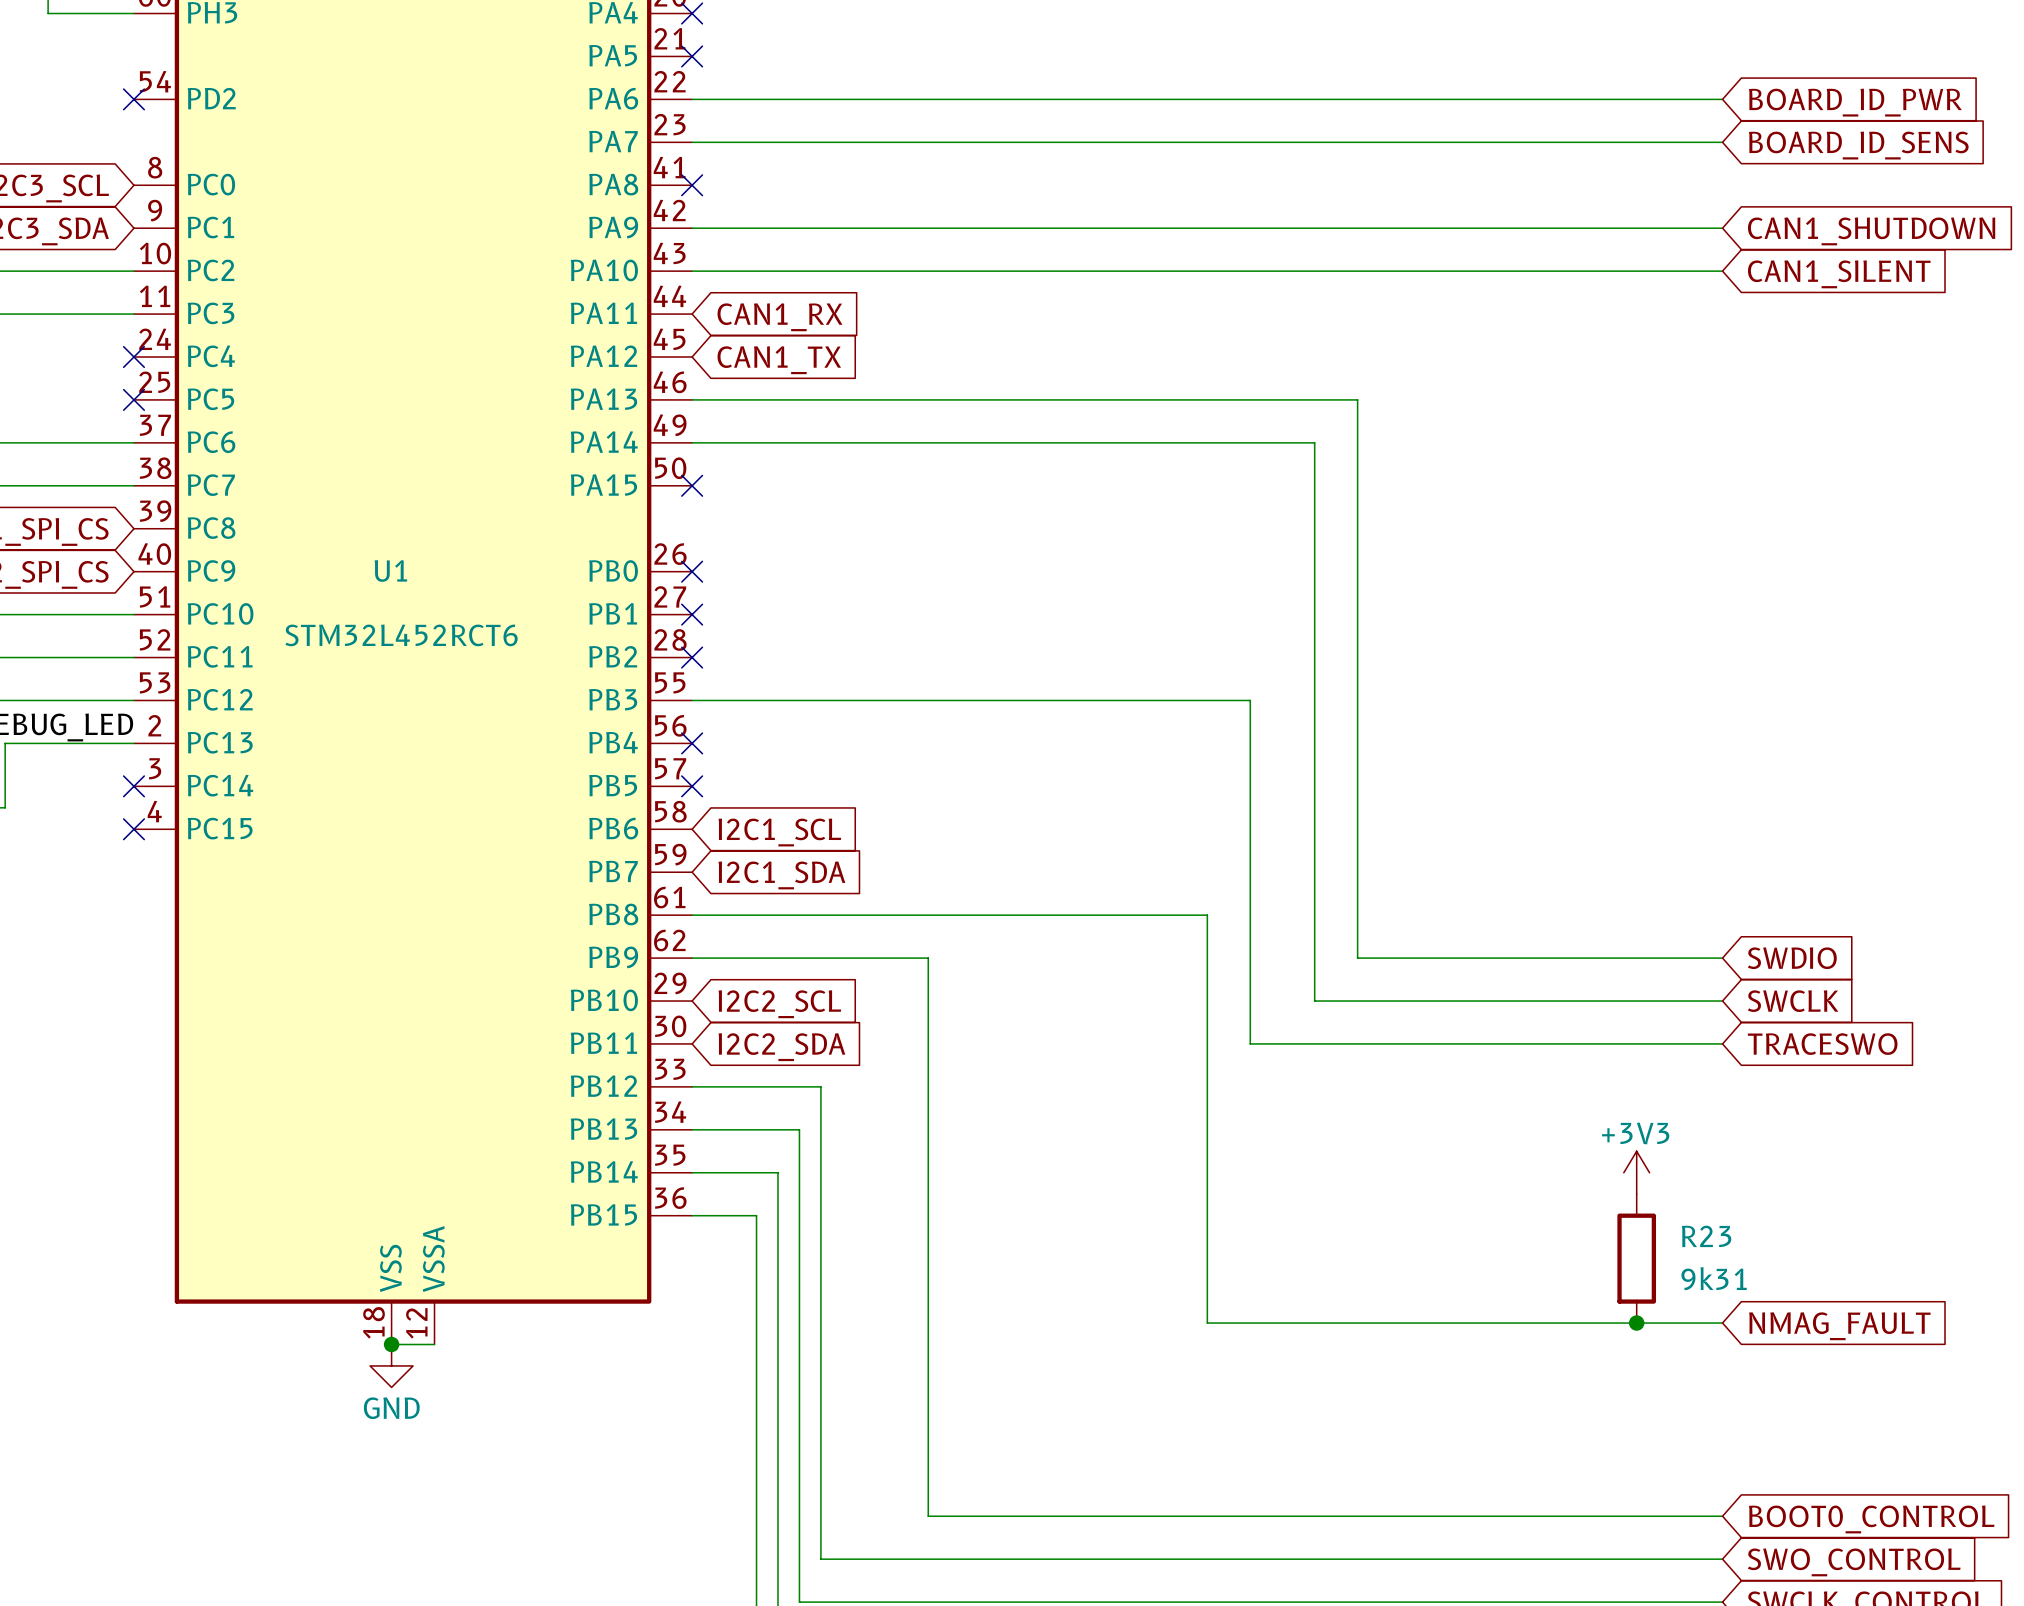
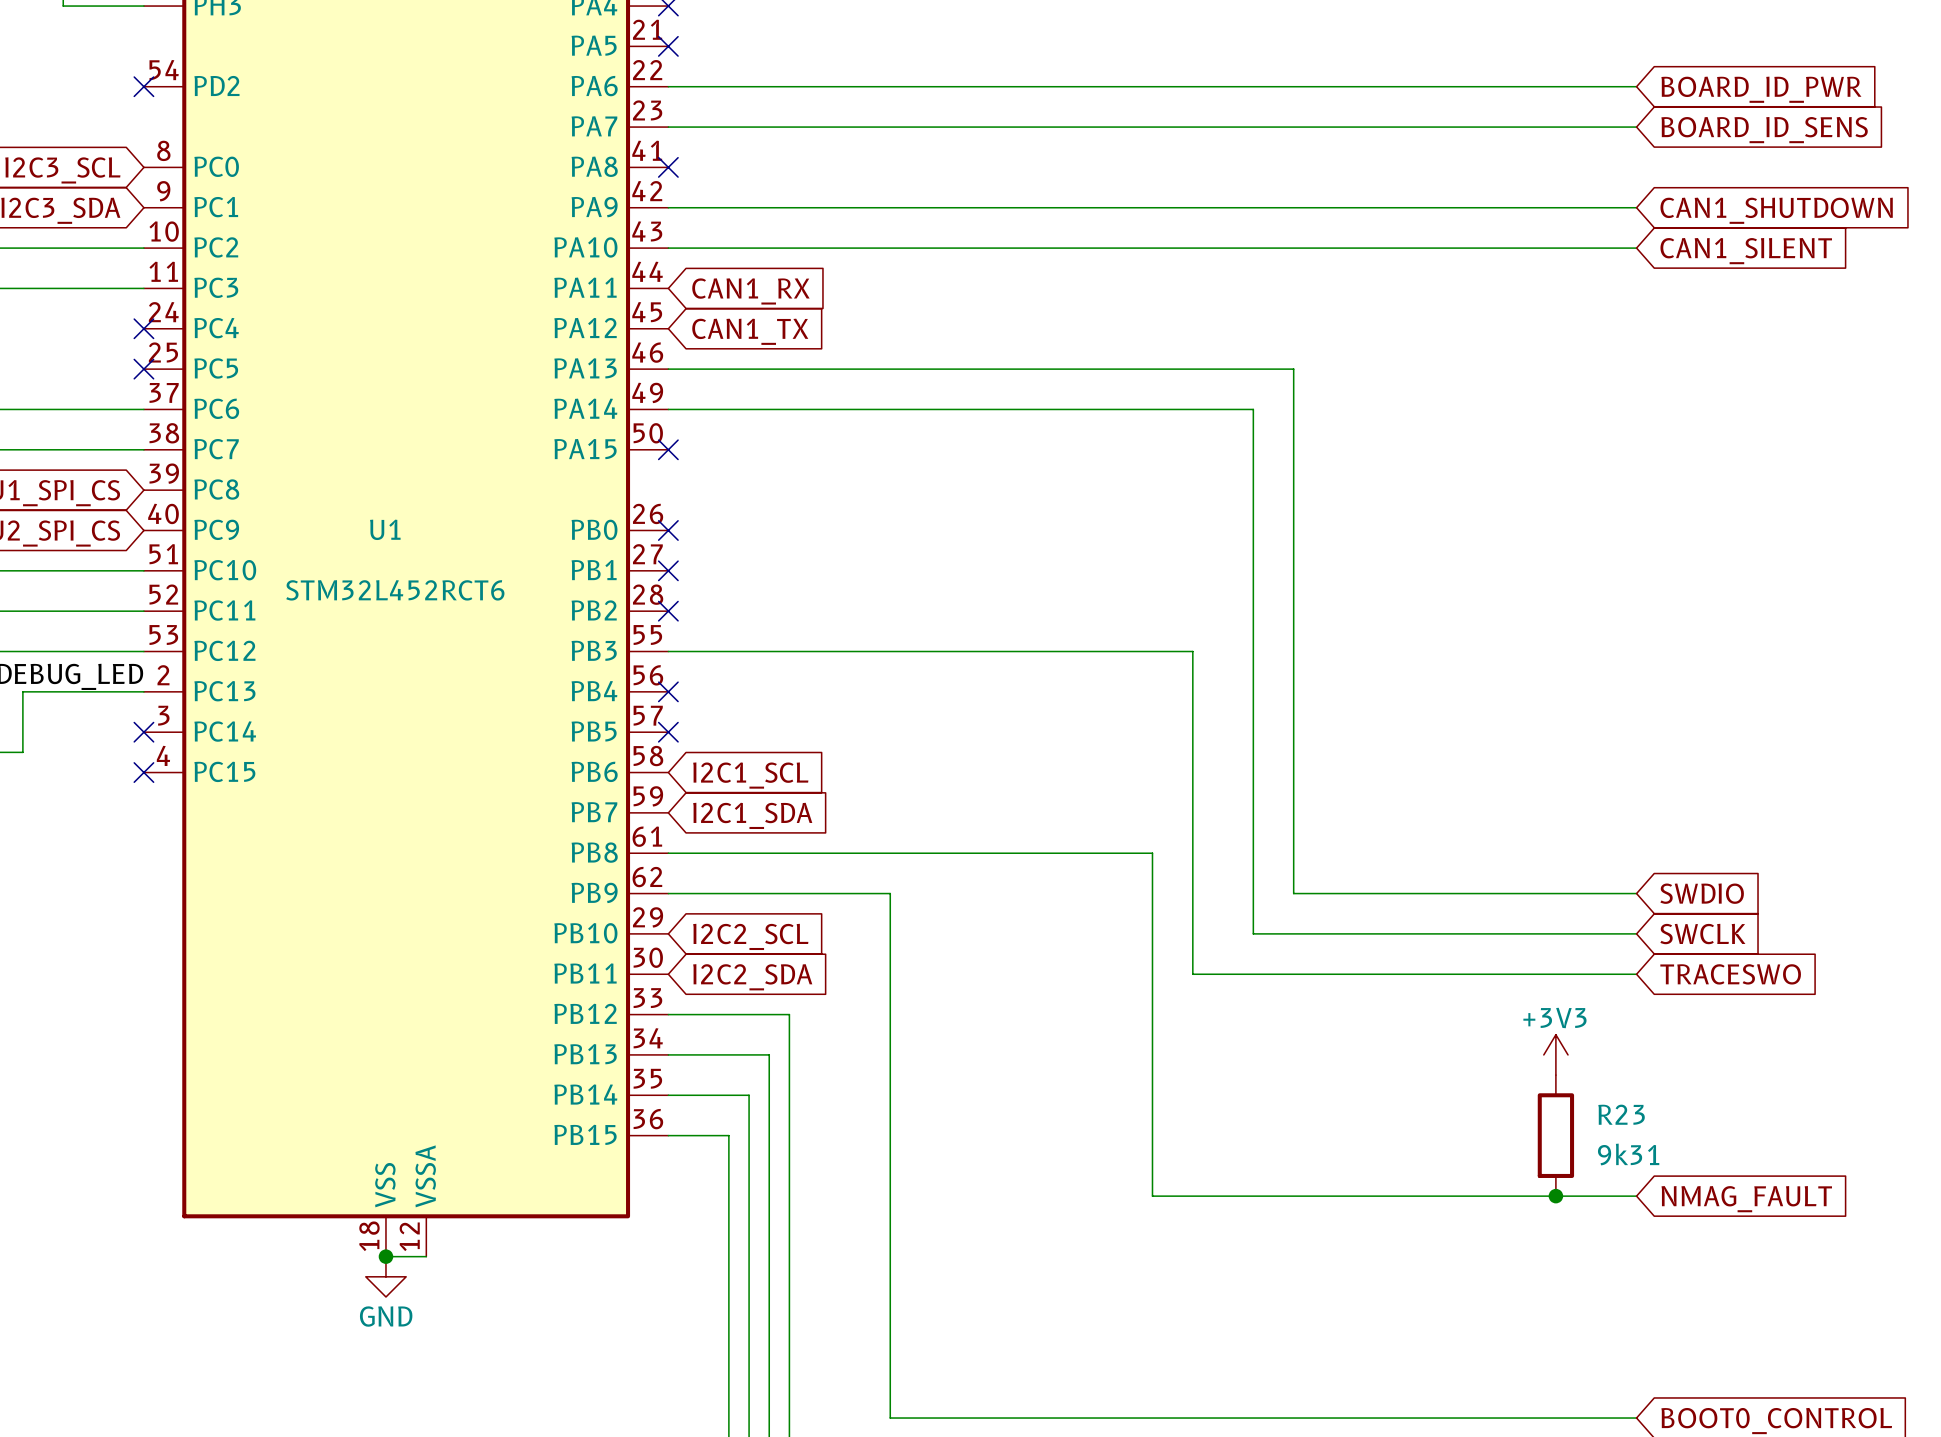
power symbol position: +3V3 (1636, 1172) -> +3V3 (1555, 1054)
R23 position: (1636, 1258) -> (1555, 1135)
wire: (1207, 1280) (1207, 1323) (1722, 1323) -> (1152, 1196) (1636, 1196)
junction position: (1636, 1323) -> (1555, 1196)
global label position: NMAG_FAULT (1839, 1326) -> NMAG_FAULT (1746, 1199)

